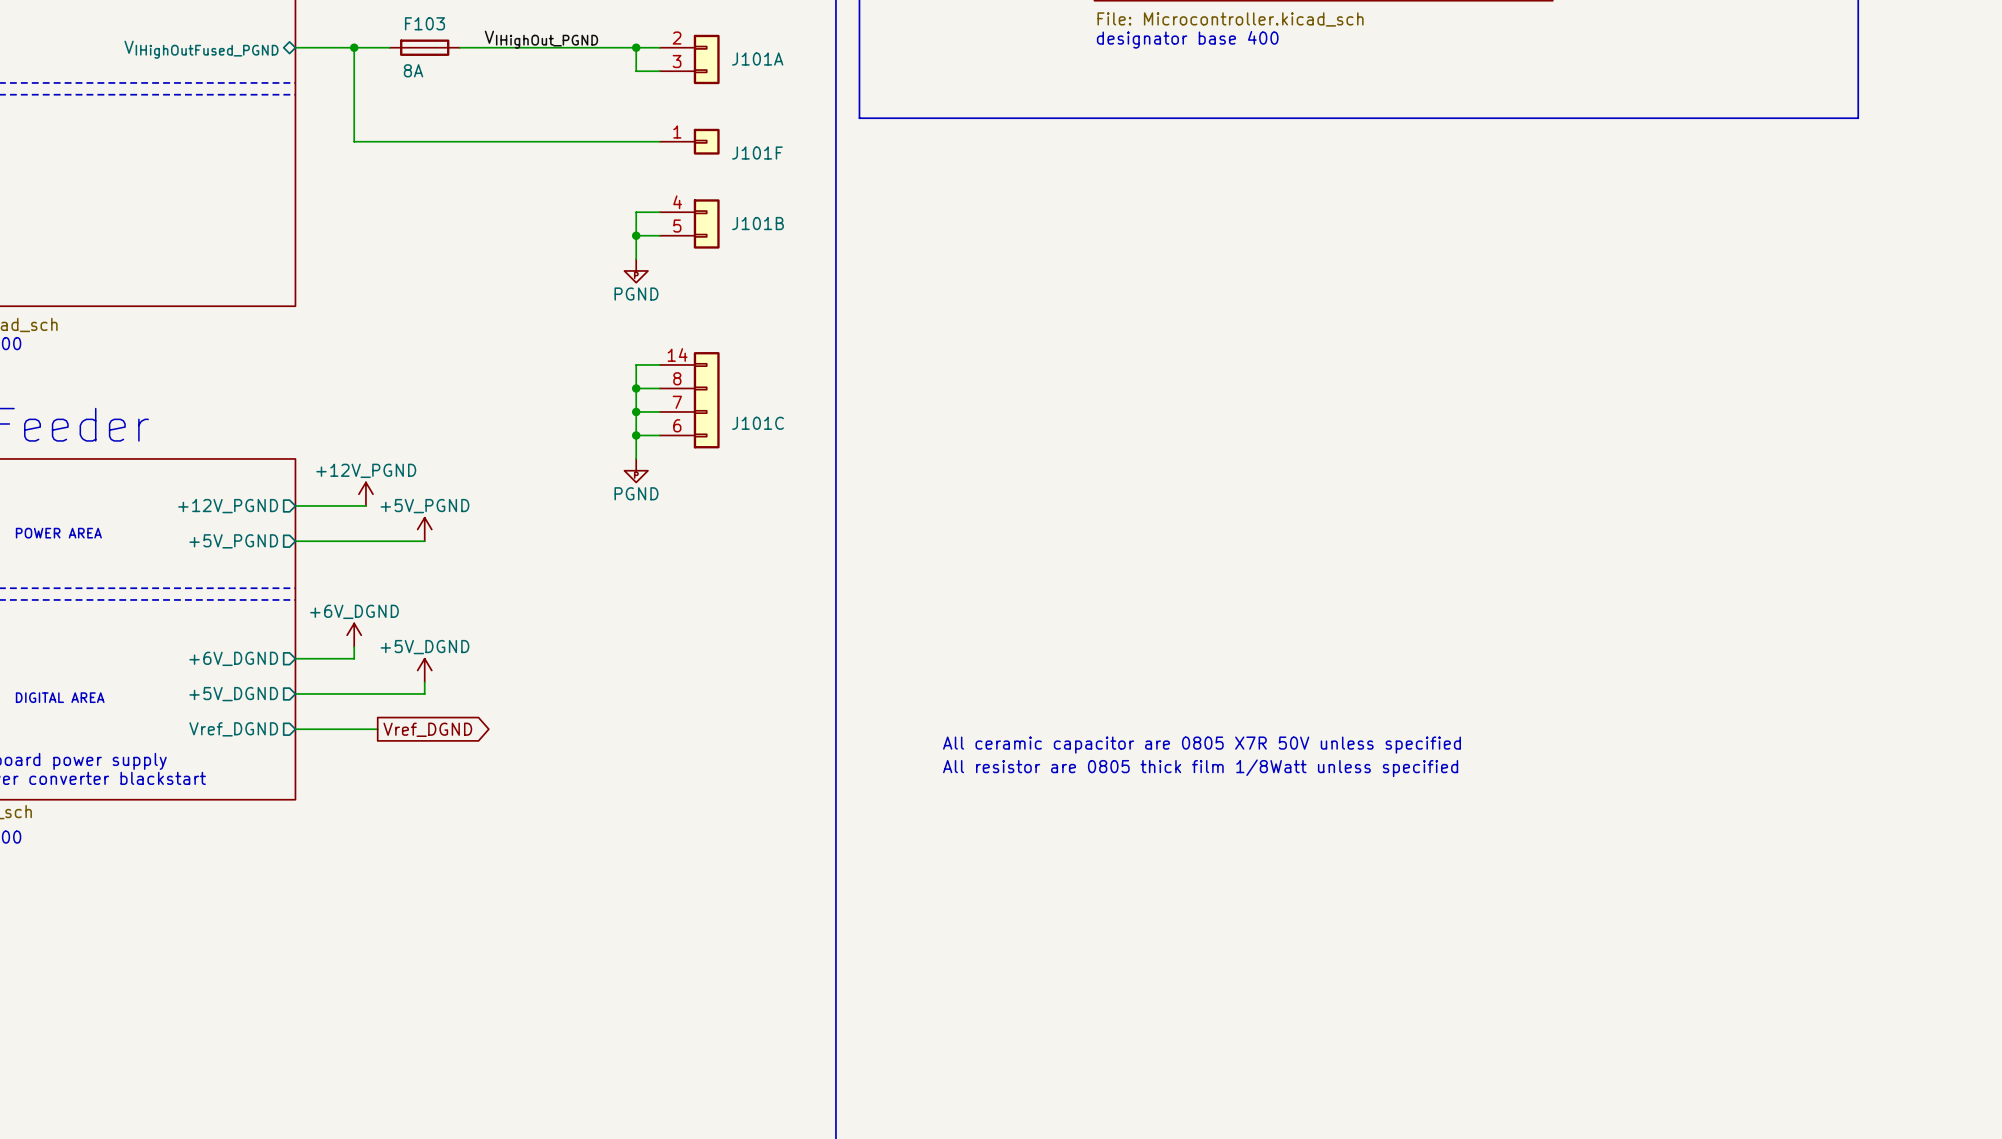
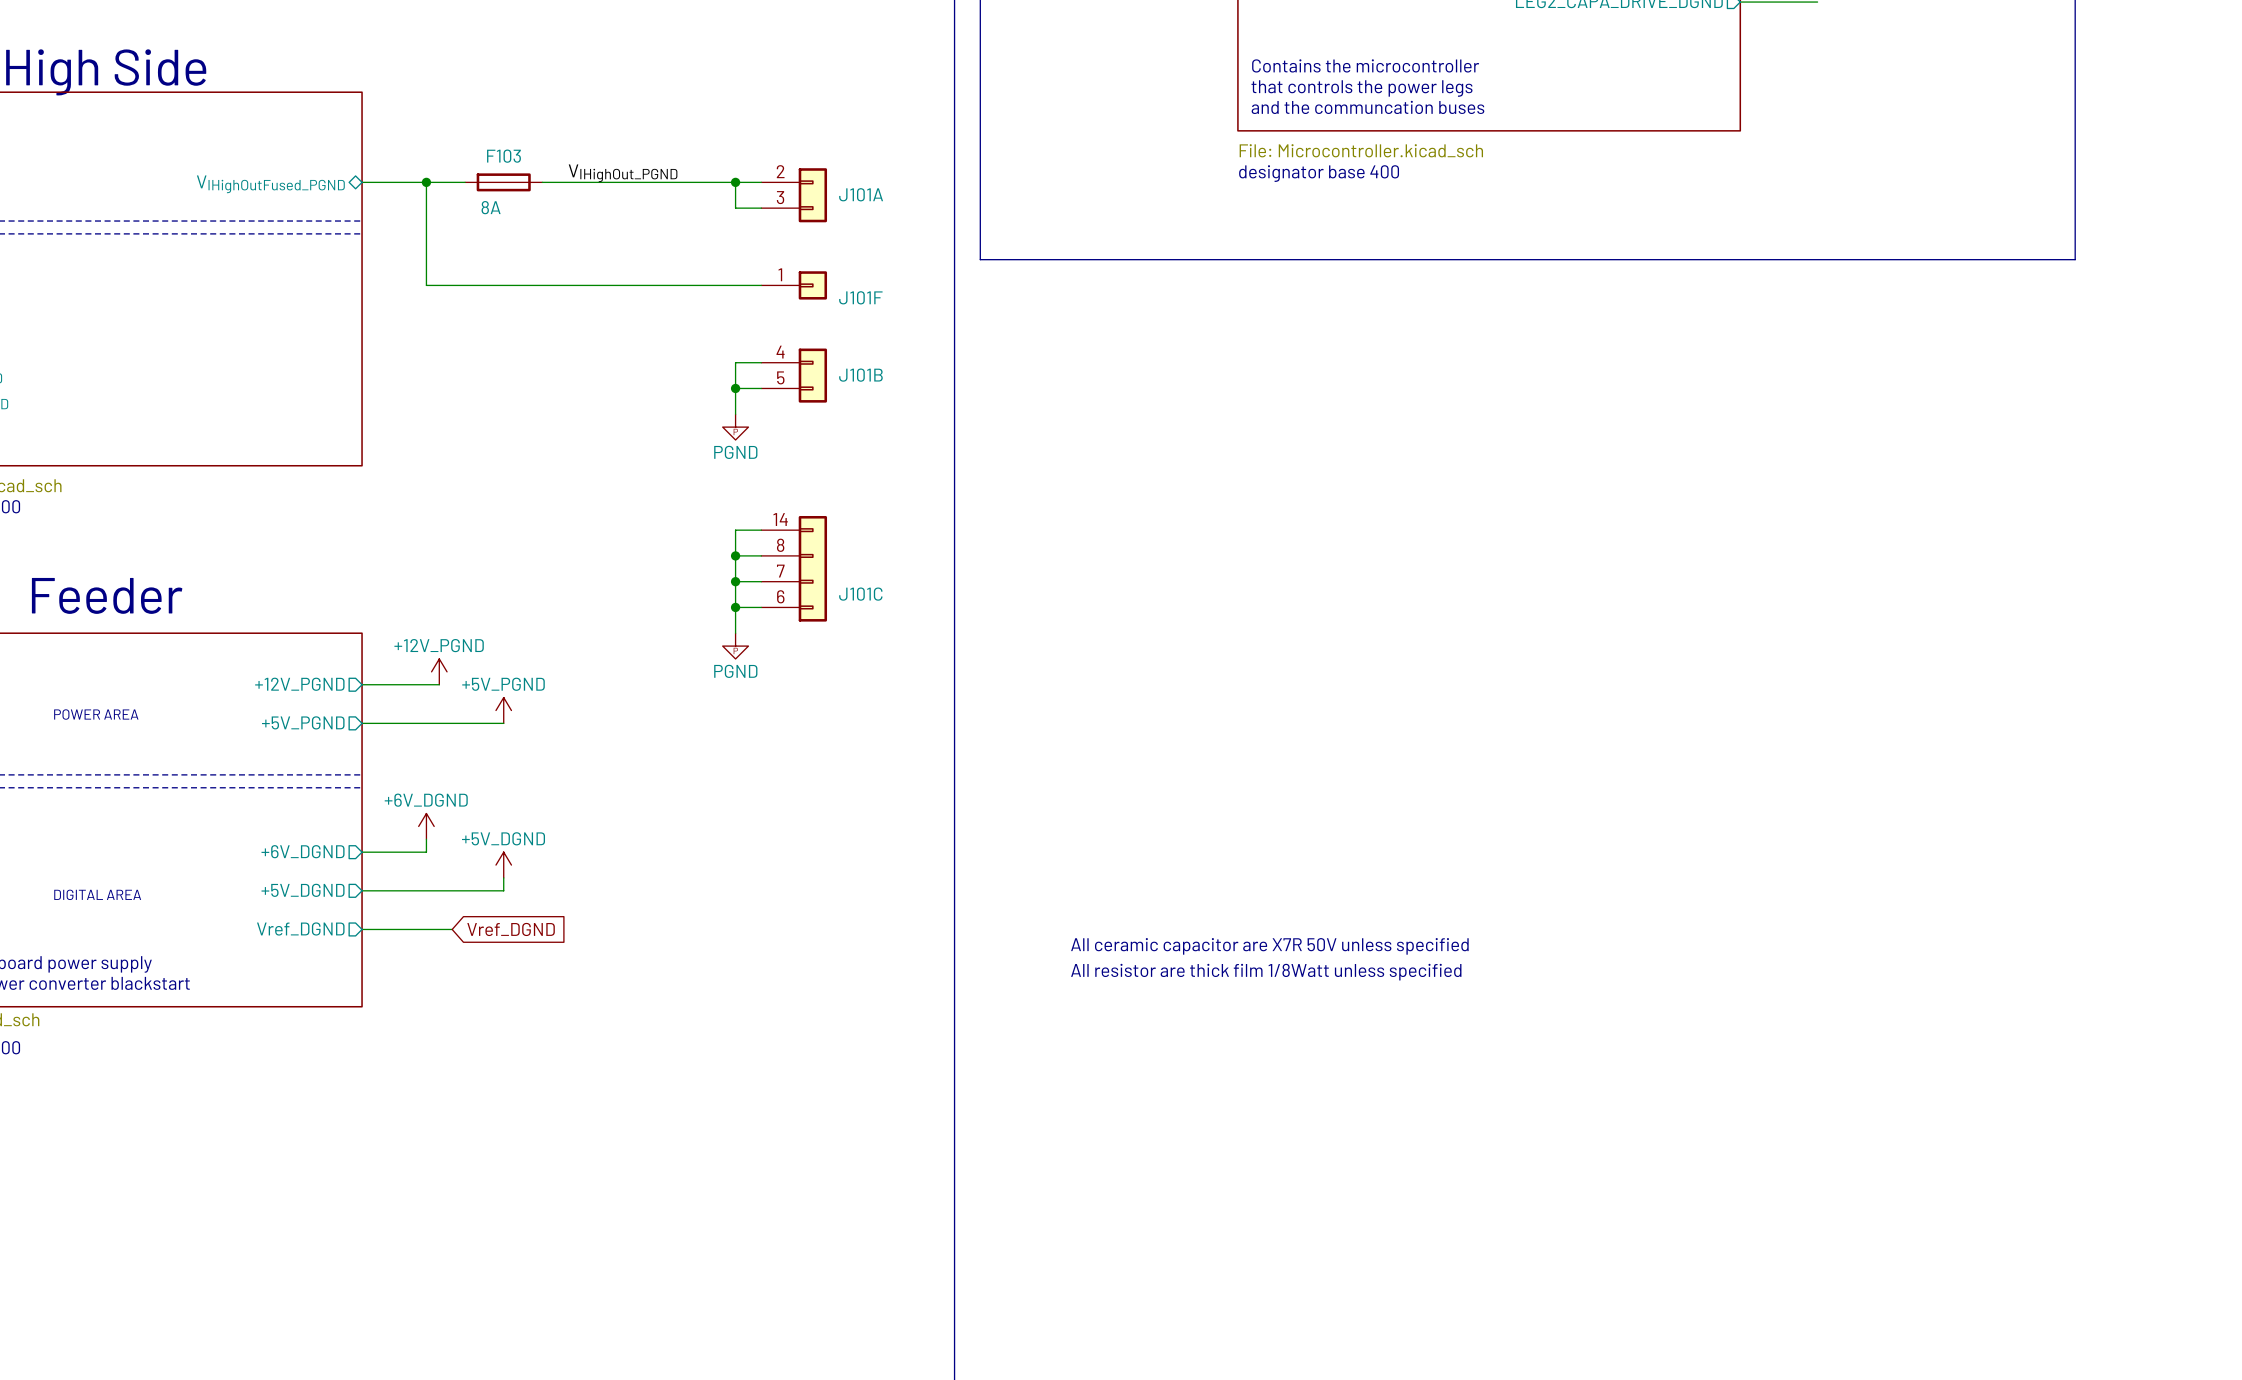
global label shape: output (427, 729) -> input (511, 929)
text: All ceramic capacitor are 0805 X7R 50V unless specified (1201, 745) -> All ceramic capacitor are X7R 50V unless specified (1269, 946)
text: All resistor are 0805 thick film 1/8Watt unless specified (1200, 768) -> All resistor are thick film 1/8Watt unless specified (1266, 972)

